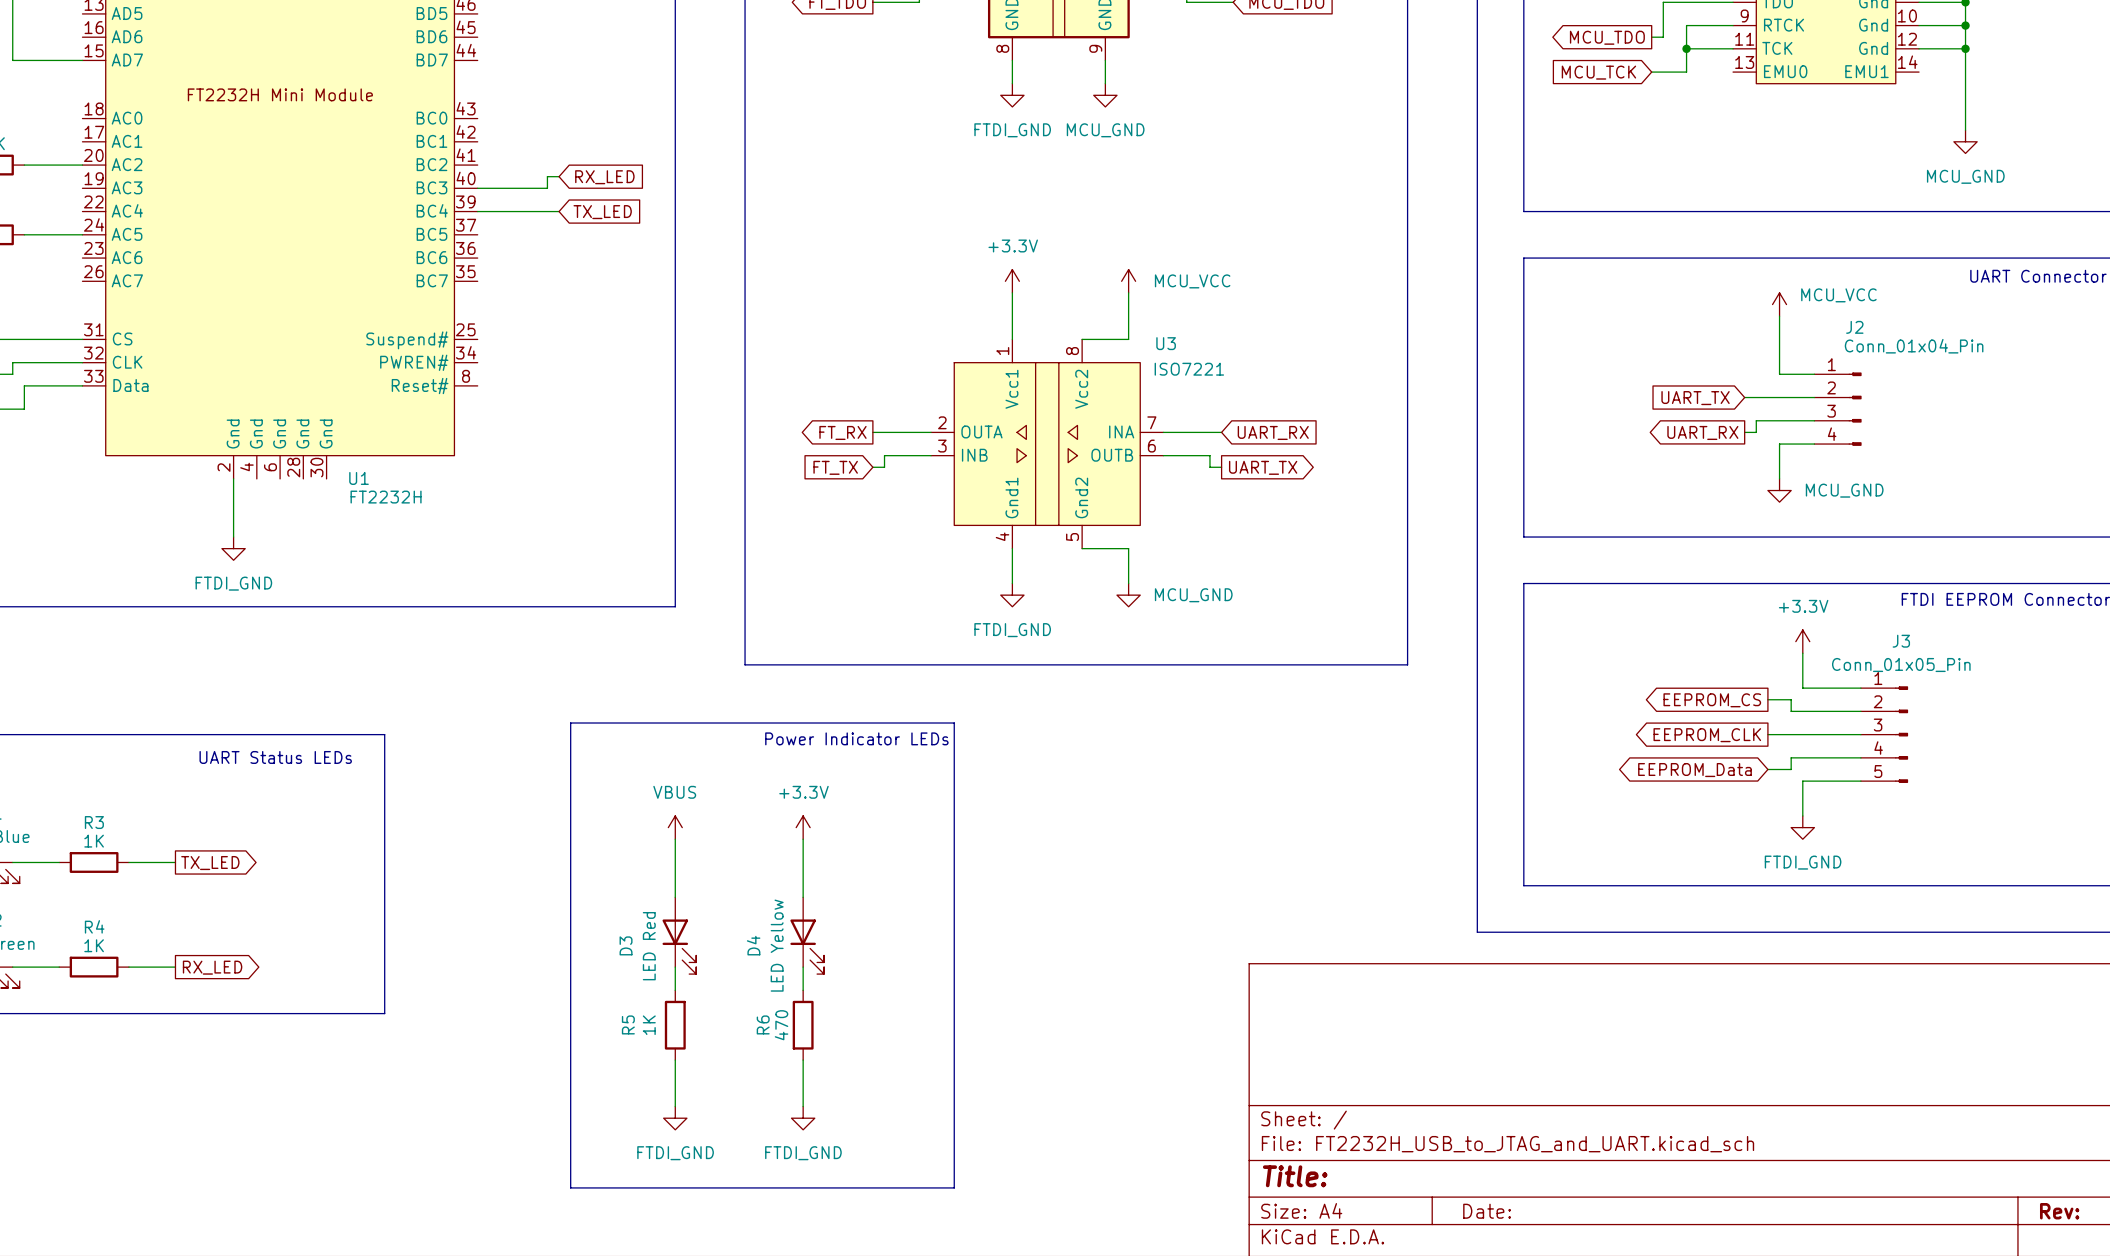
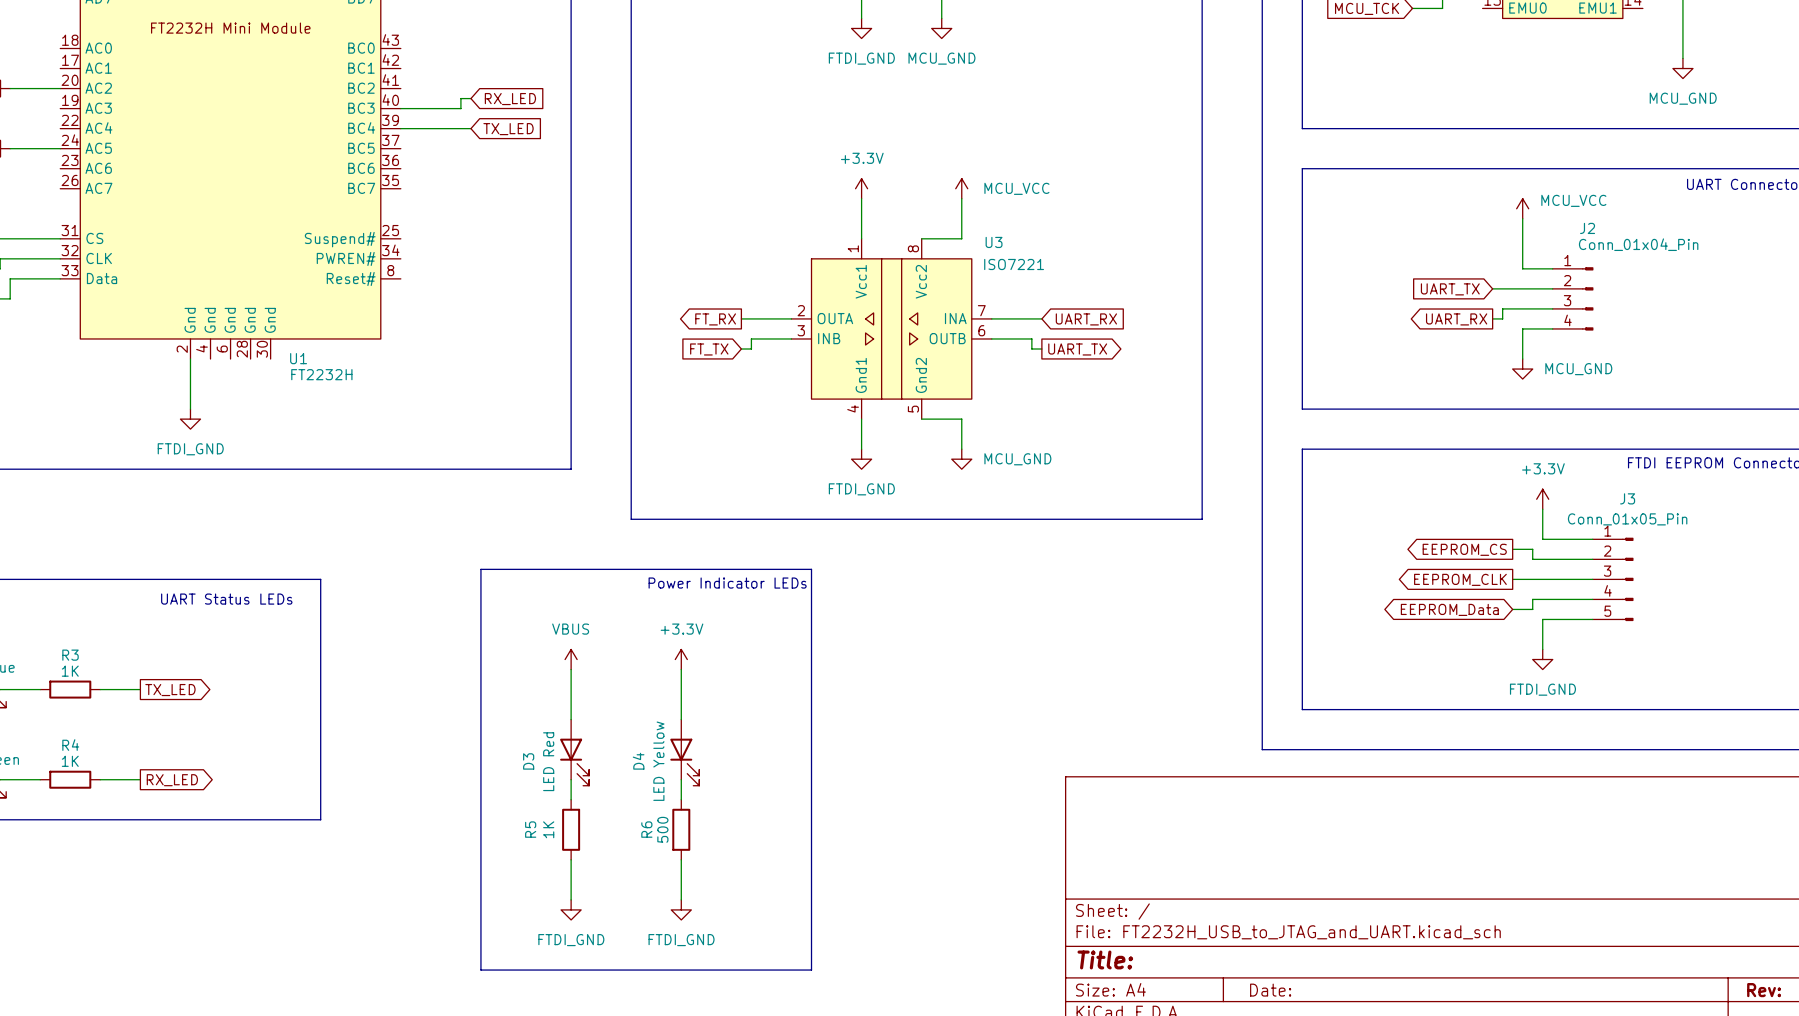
R6 value: 470 (781, 1025) -> 500 (662, 829)

